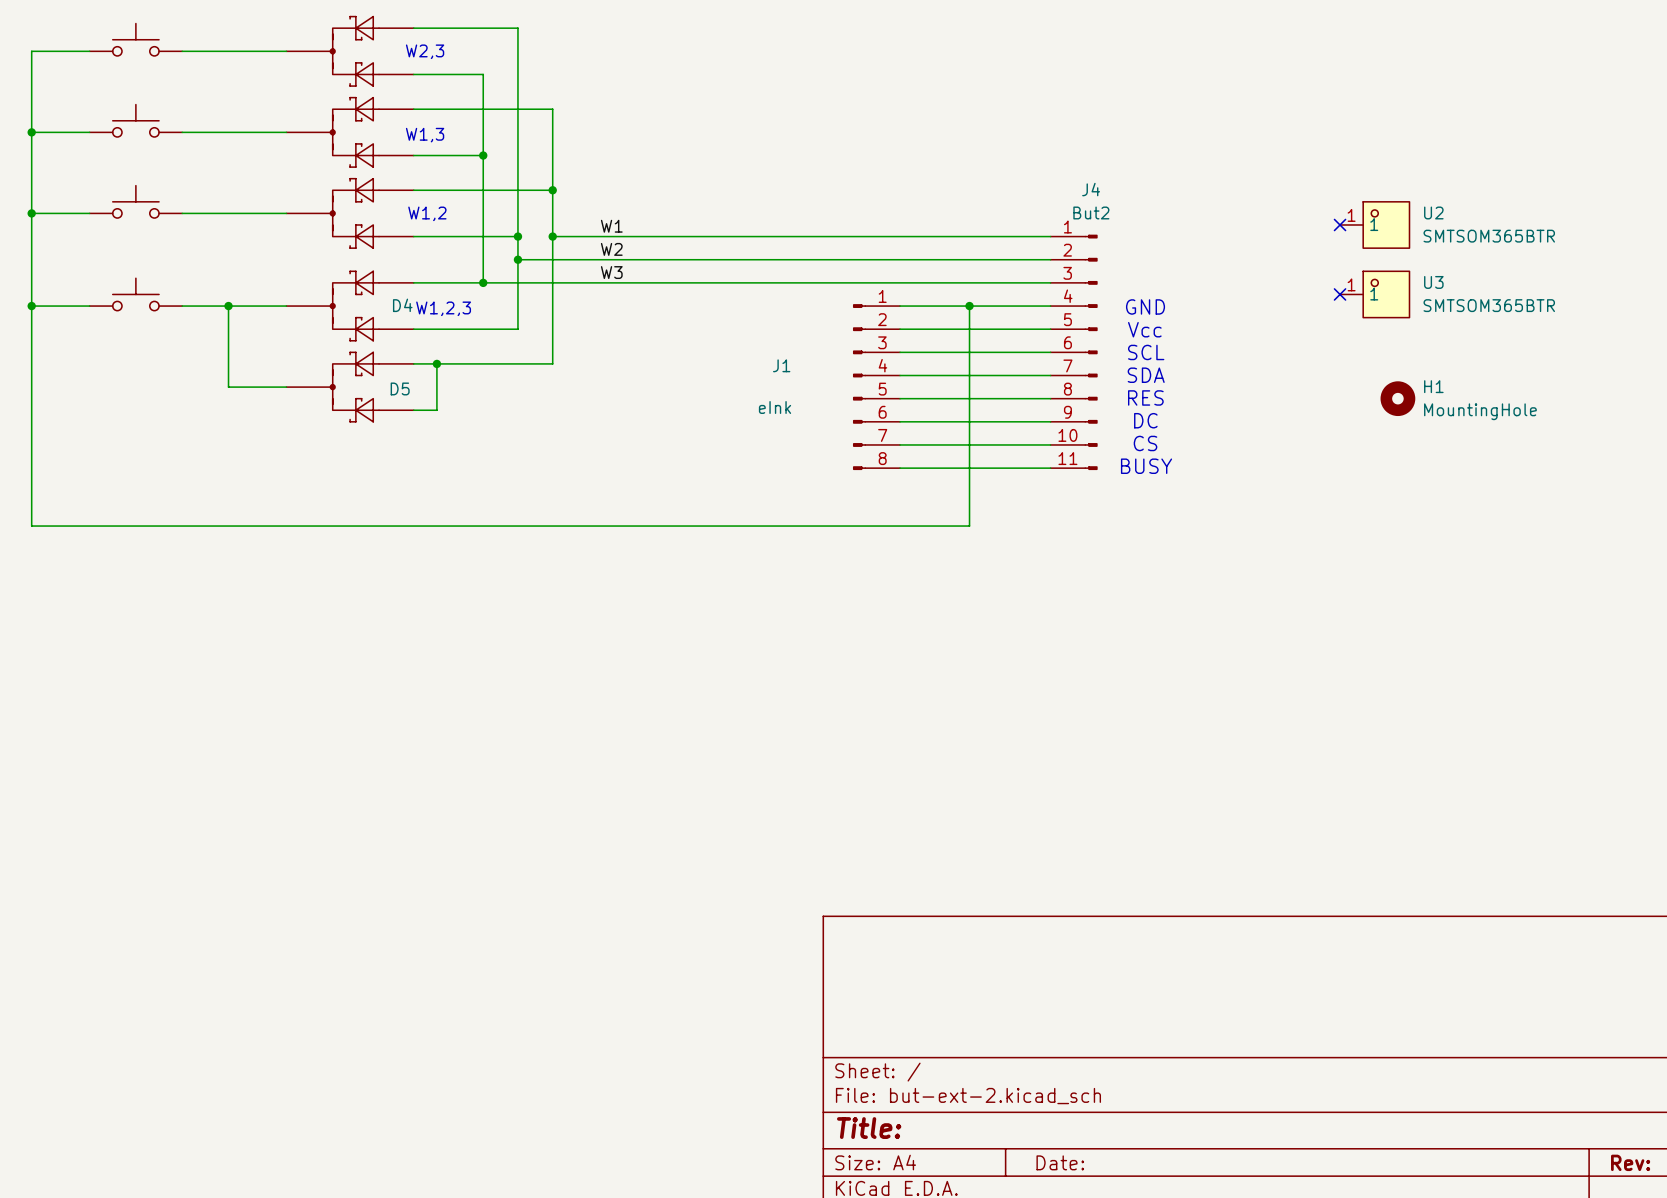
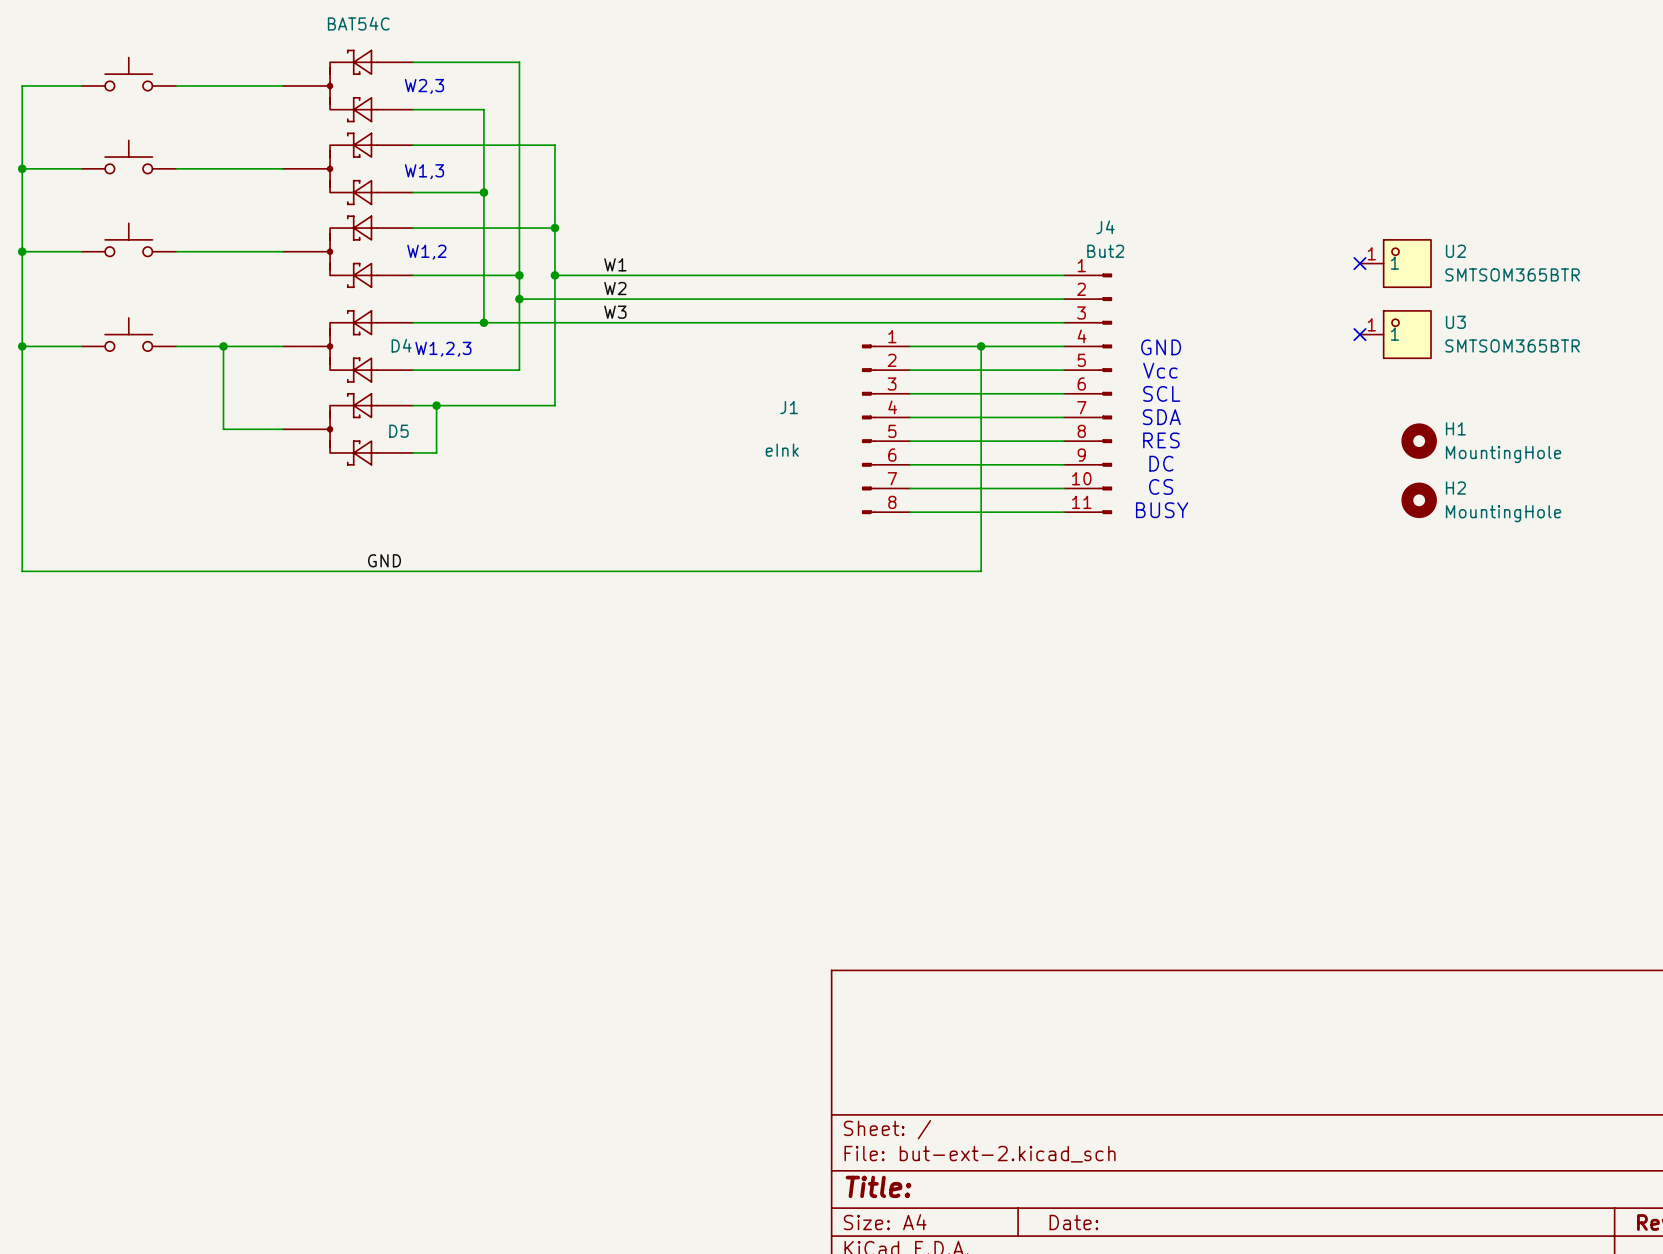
H2: none -> MountingHole (1419, 500)
label: none -> GND (384, 560)

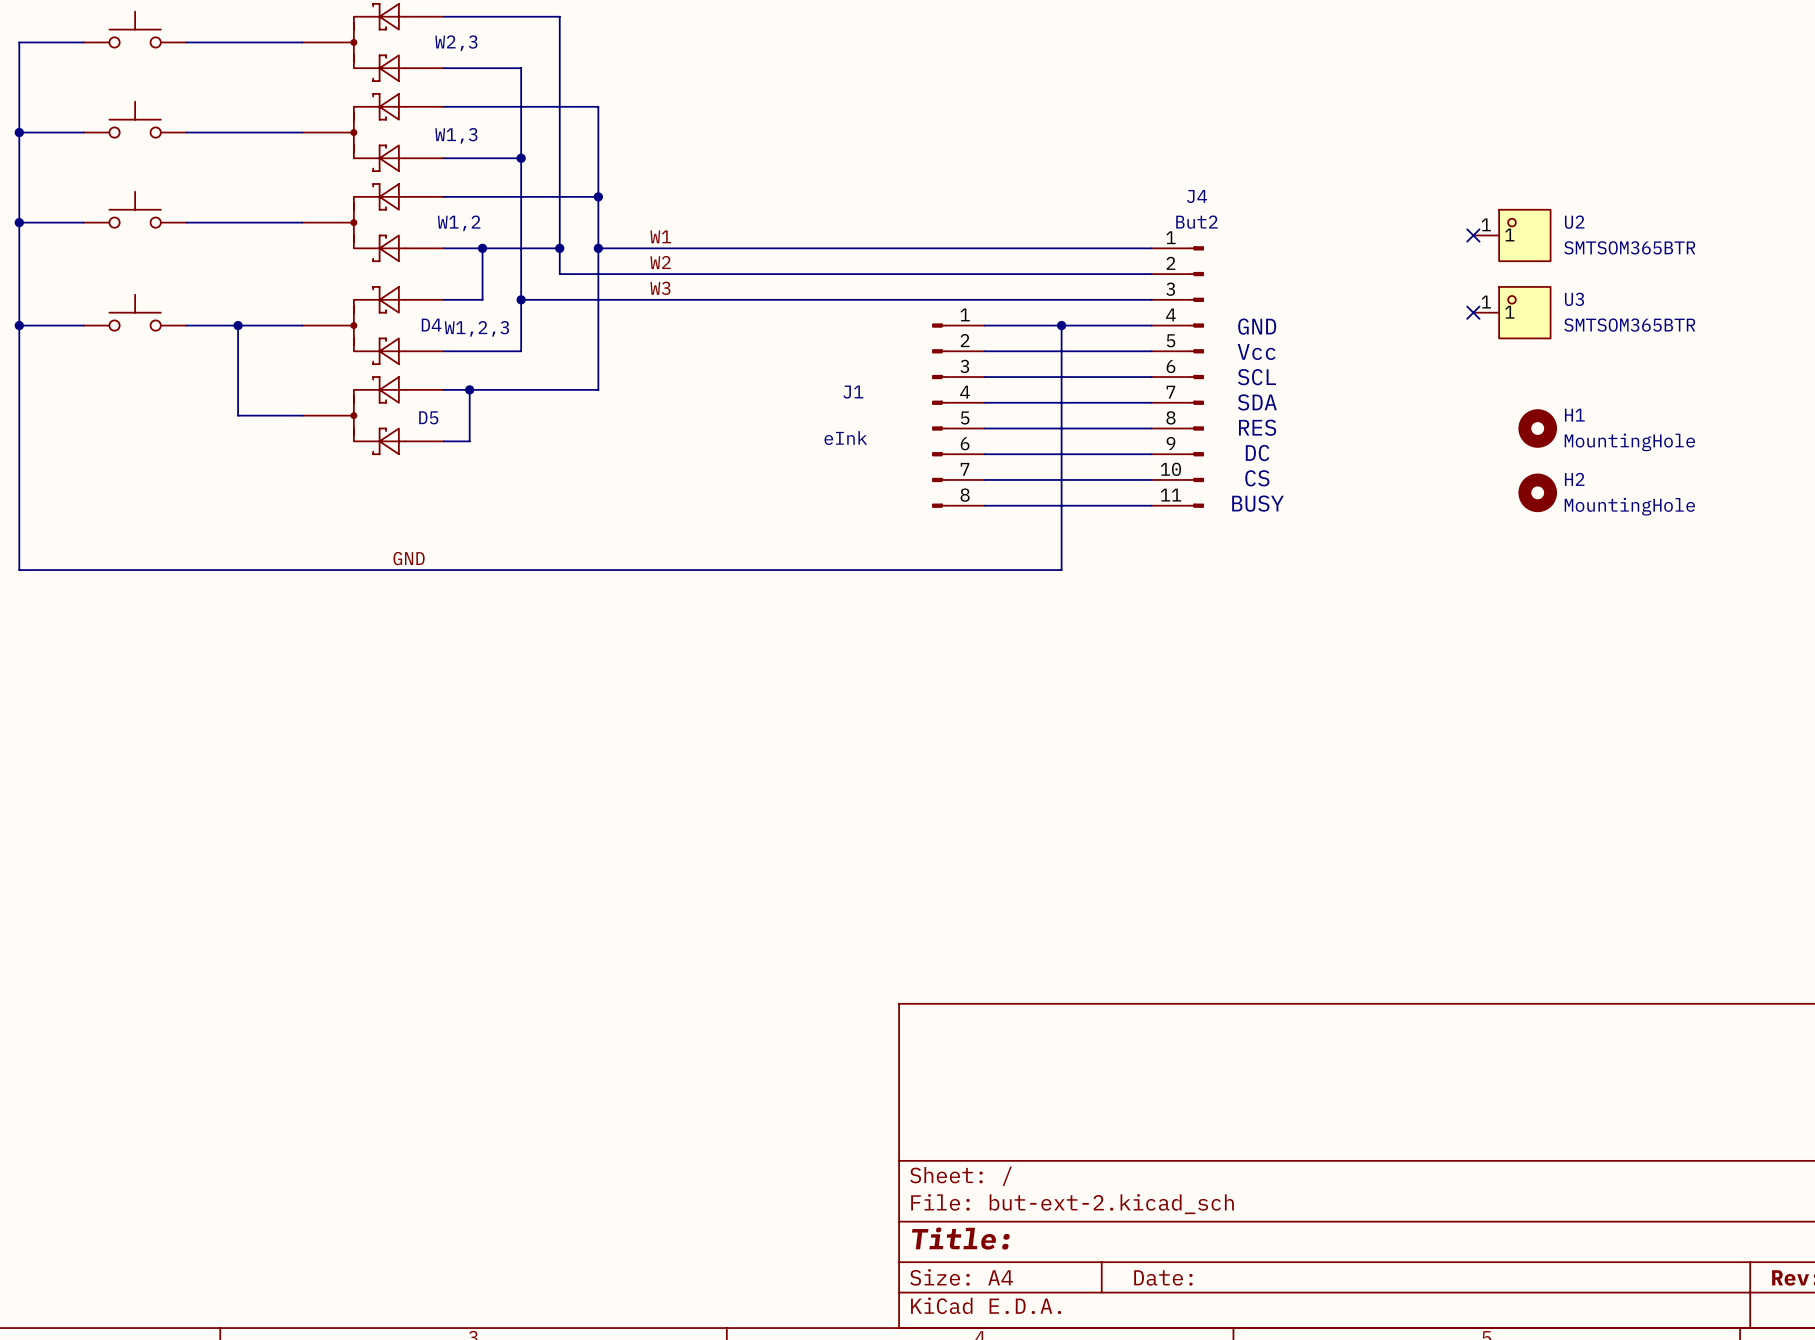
junction: none -> (482, 248)
wire: (519, 299) (519, 370) (483, 370) -> (521, 299) (521, 351)
junction: (519, 299) -> none
wire: (448, 322) (483, 322) -> (482, 299) (482, 248)

